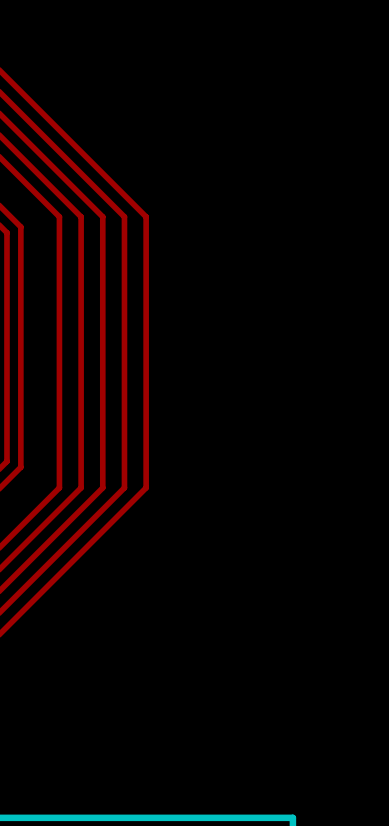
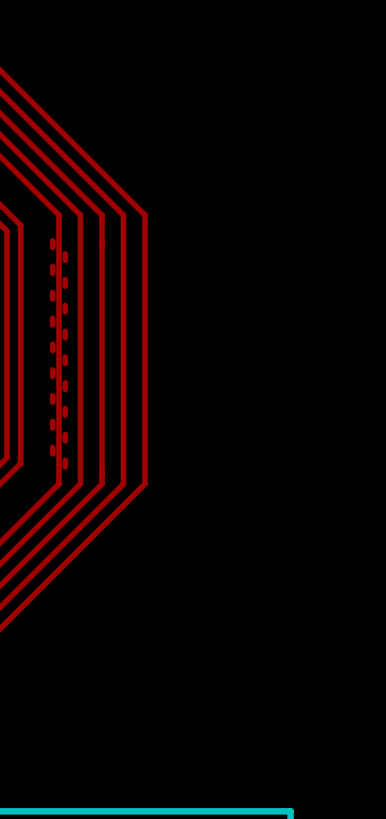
track: none -> (52, 240) (52, 247)
track: none -> (65, 253) (65, 260)
track: none -> (52, 266) (52, 273)
track: none -> (65, 279) (65, 286)
track: none -> (52, 292) (52, 299)
track: none -> (65, 305) (65, 311)
track: none -> (52, 318) (52, 324)
track: none -> (65, 331) (65, 337)
track: none -> (52, 344) (52, 350)
track: none -> (65, 357) (65, 363)
track: none -> (52, 369) (52, 376)
track: none -> (65, 382) (65, 389)
track: none -> (52, 395) (52, 402)
track: none -> (65, 408) (65, 415)
track: none -> (52, 421) (52, 428)
track: none -> (65, 434) (65, 441)
track: none -> (52, 447) (52, 453)
track: none -> (65, 460) (65, 466)

